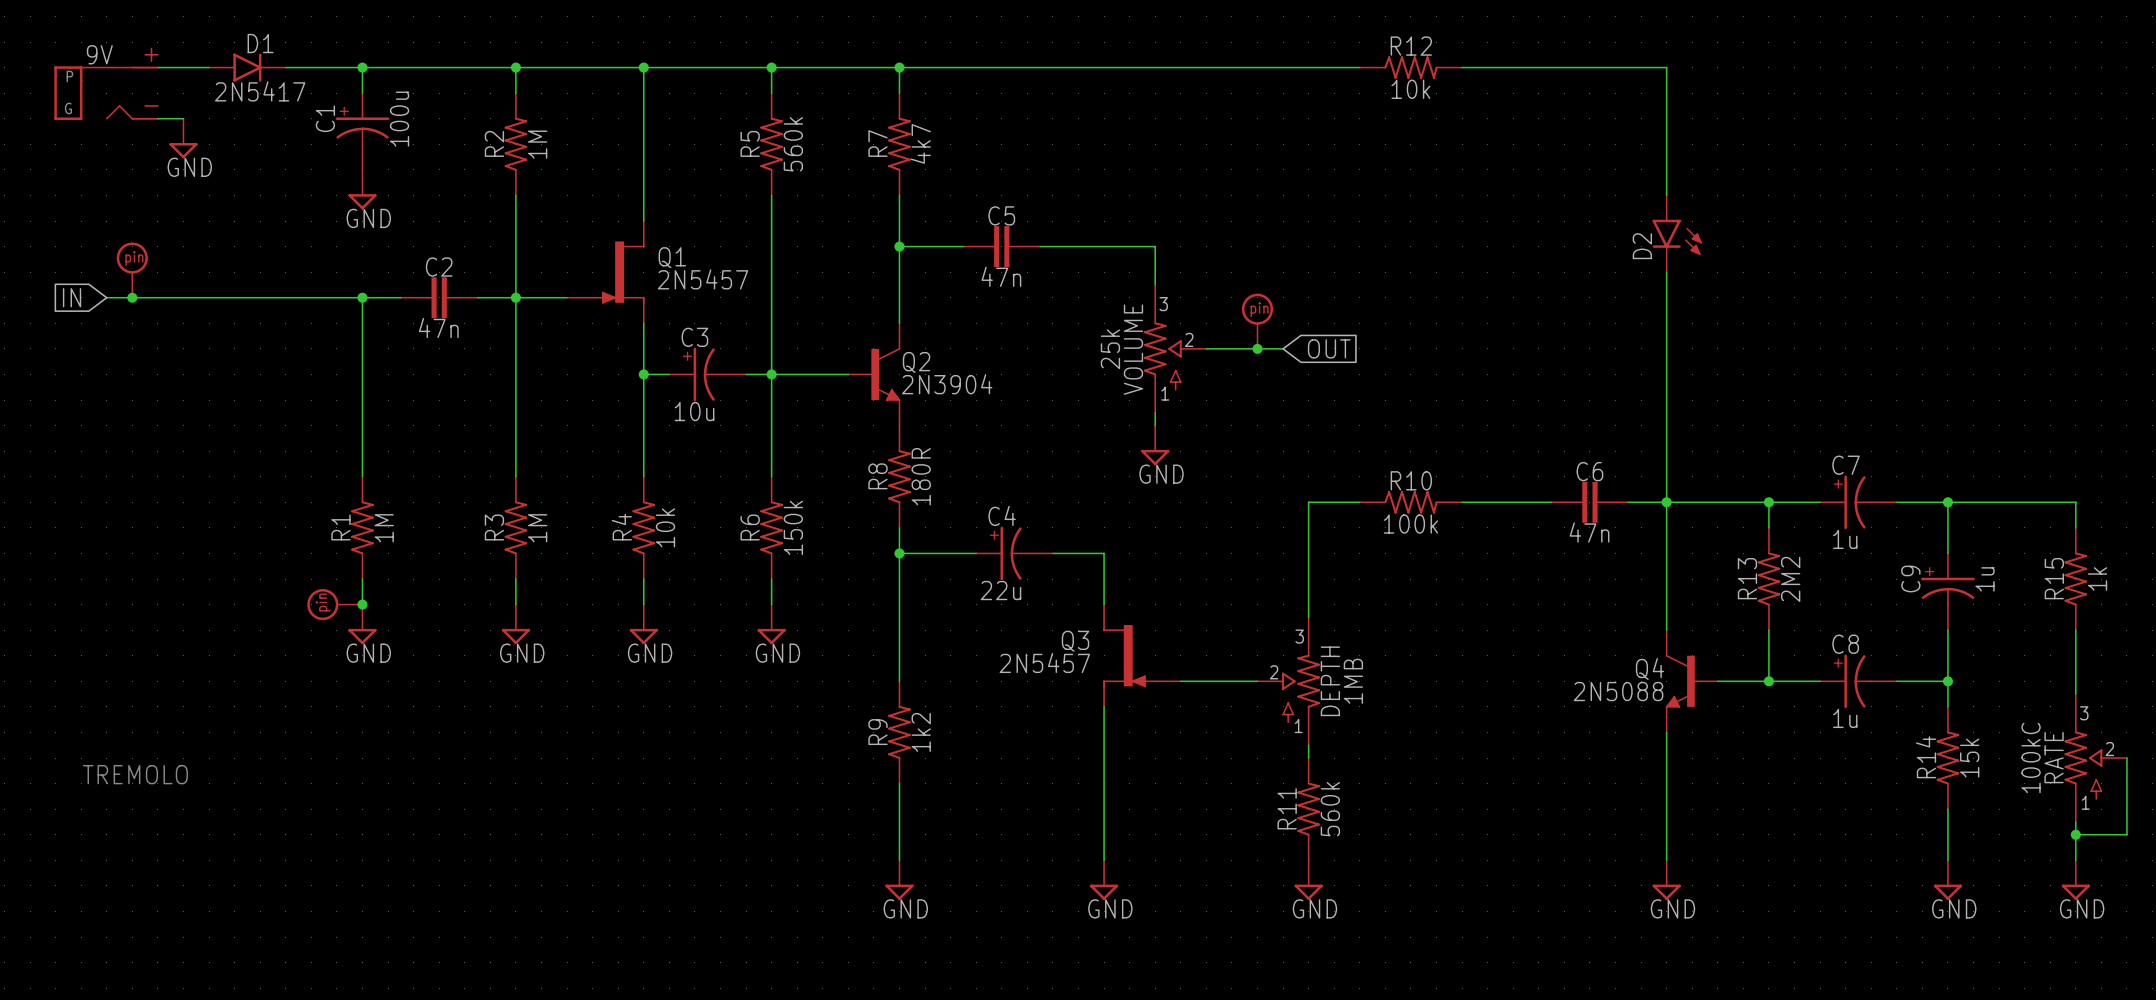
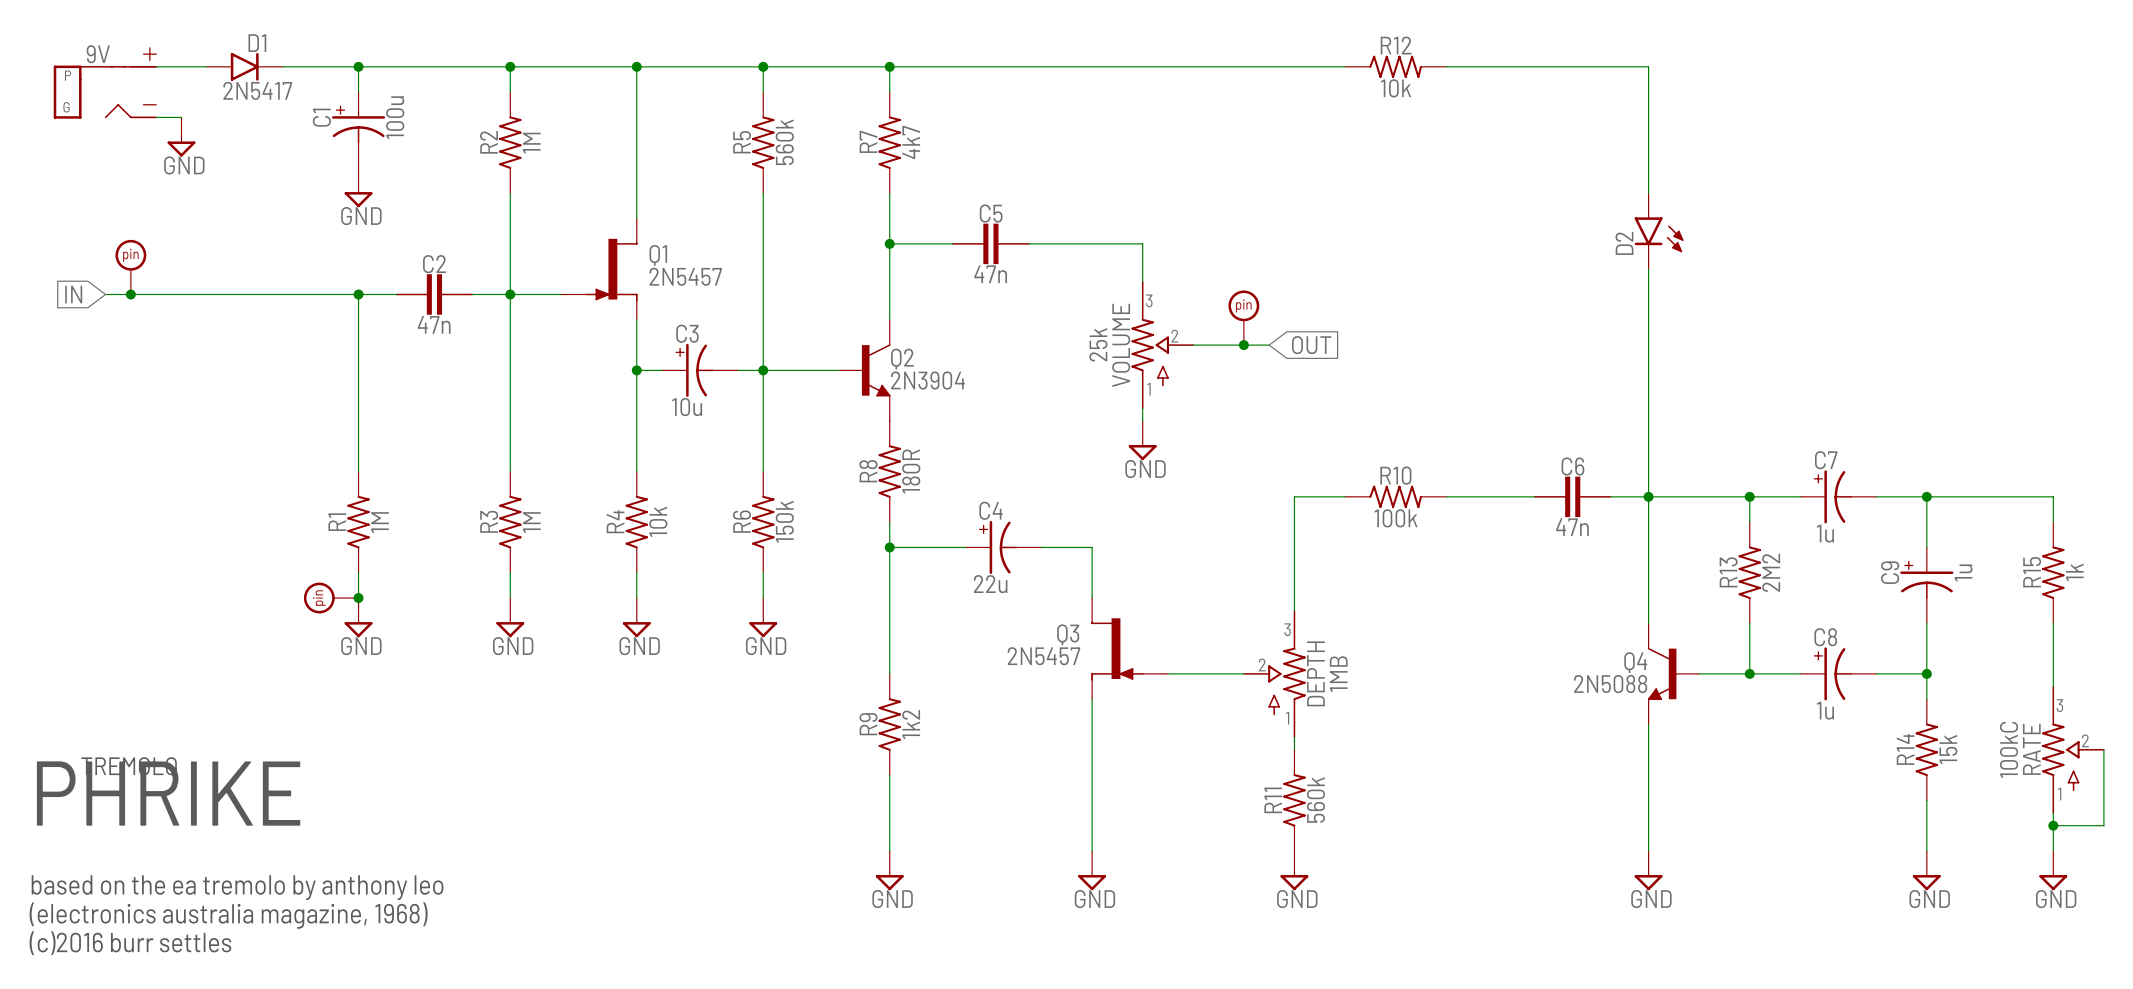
text: none -> PHRIKE (168, 793)
text: none -> based on the ea tremolo by anthony leo (237, 887)
text: none -> (electronics australia magazine, 1968) (228, 915)
text: none -> (c)2016 burr settles (130, 943)

